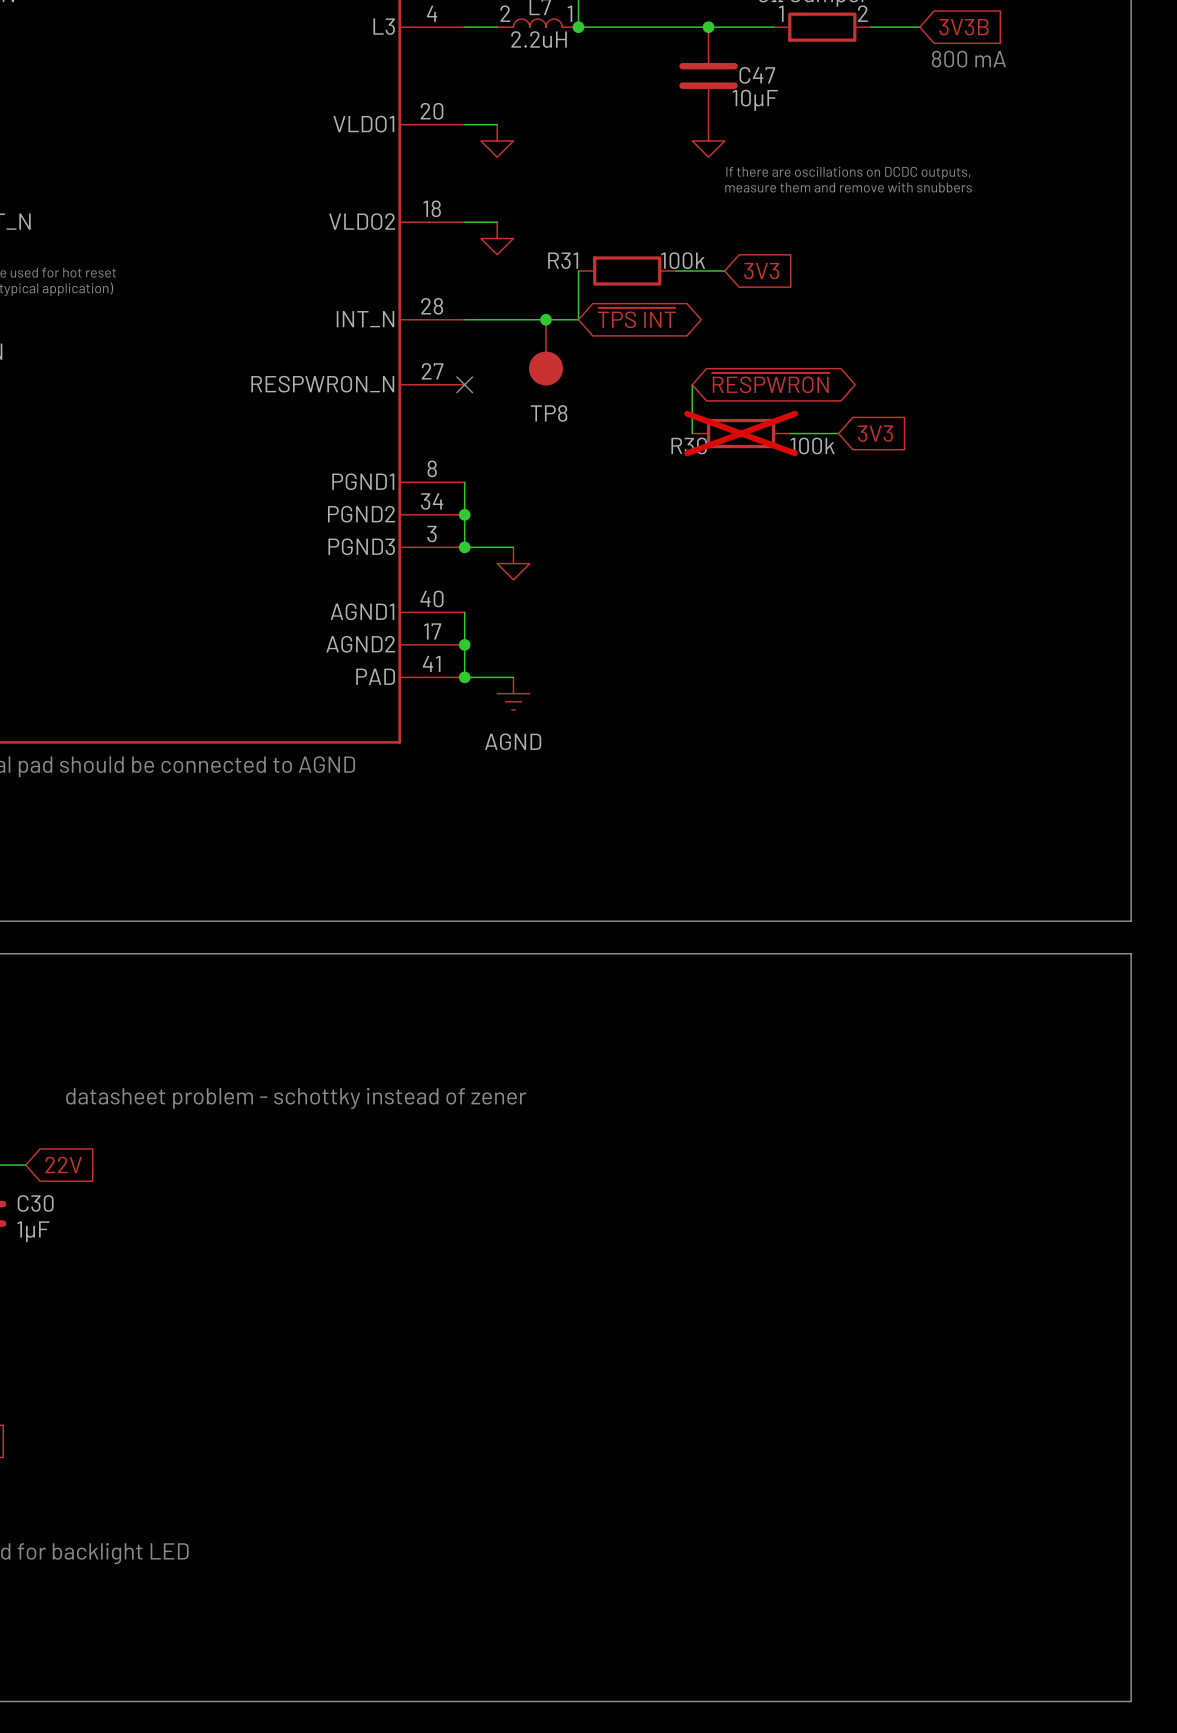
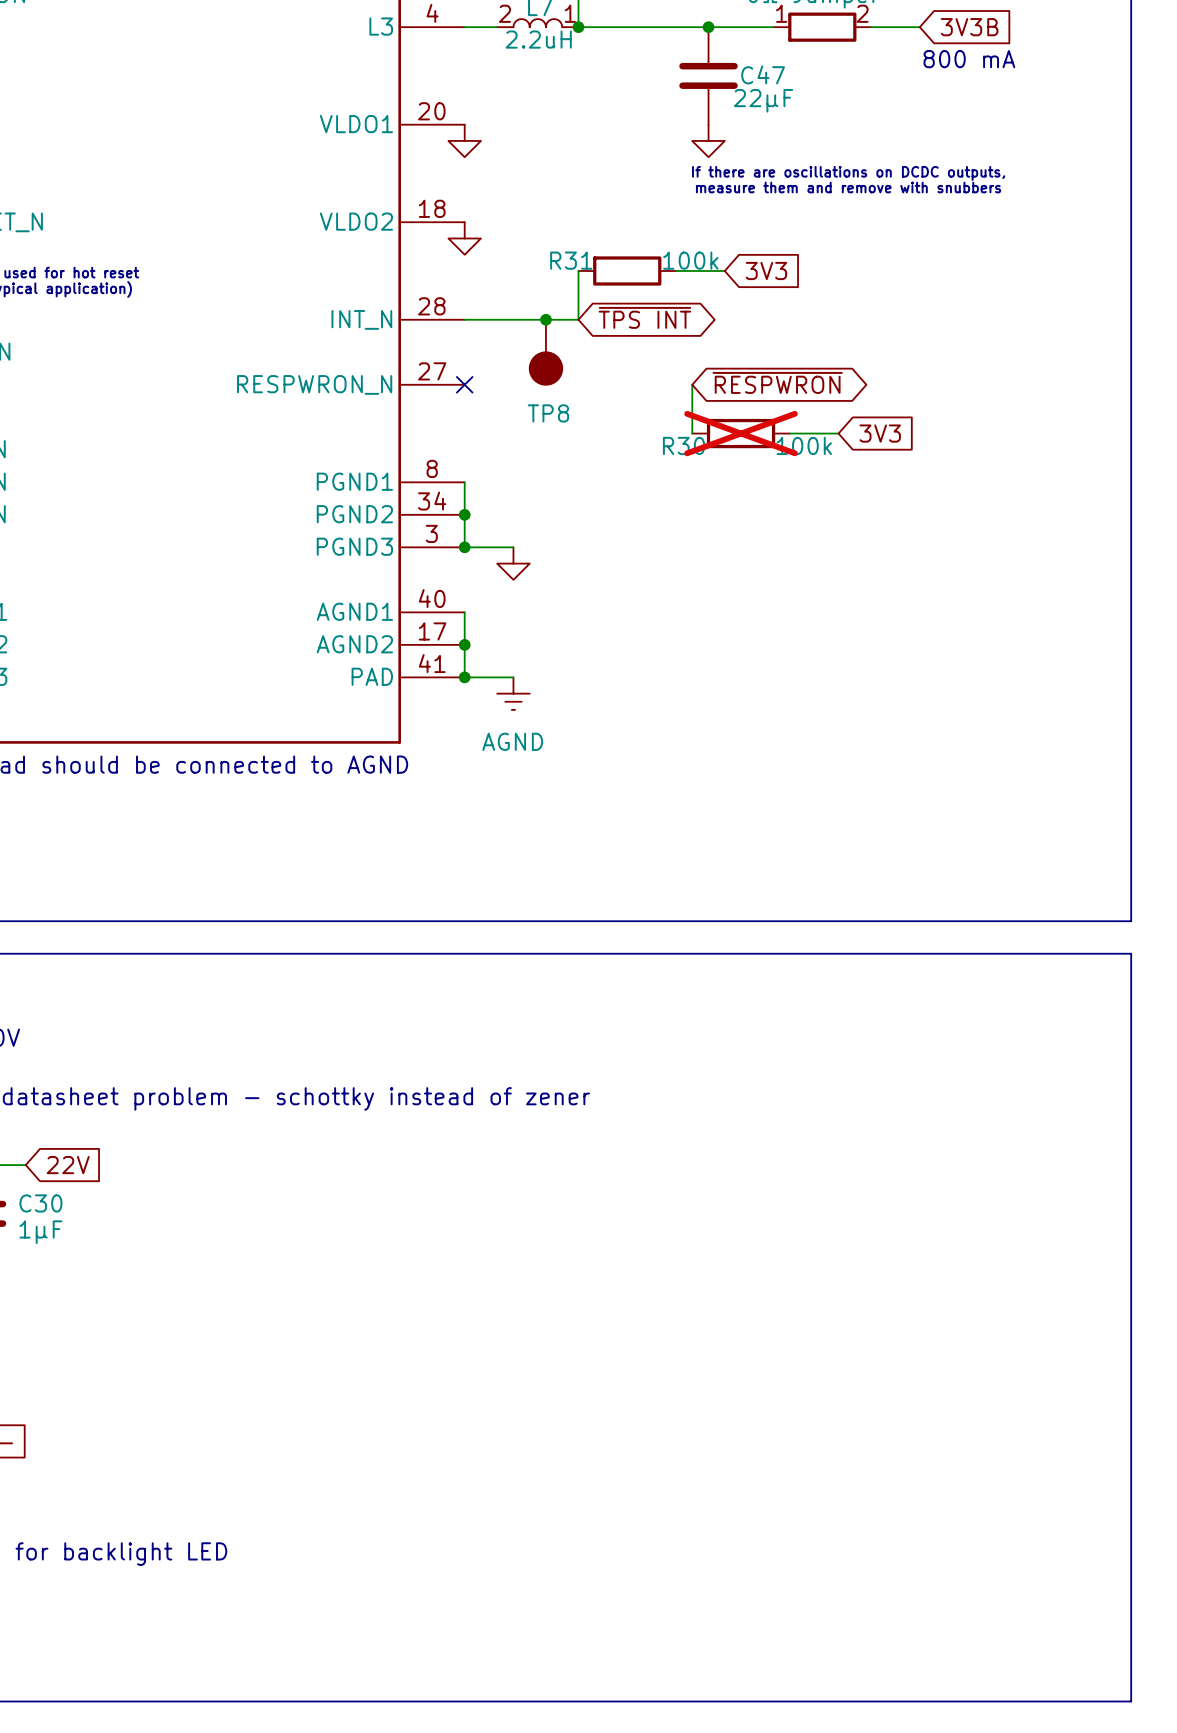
C47 value: 10μF (755, 100) -> 22μF (763, 100)
wire: (464, 124) (497, 124) -> none
power symbol position: (497, 140) -> (464, 140)
wire: (464, 222) (497, 222) -> none
power symbol position: (497, 238) -> (464, 238)

